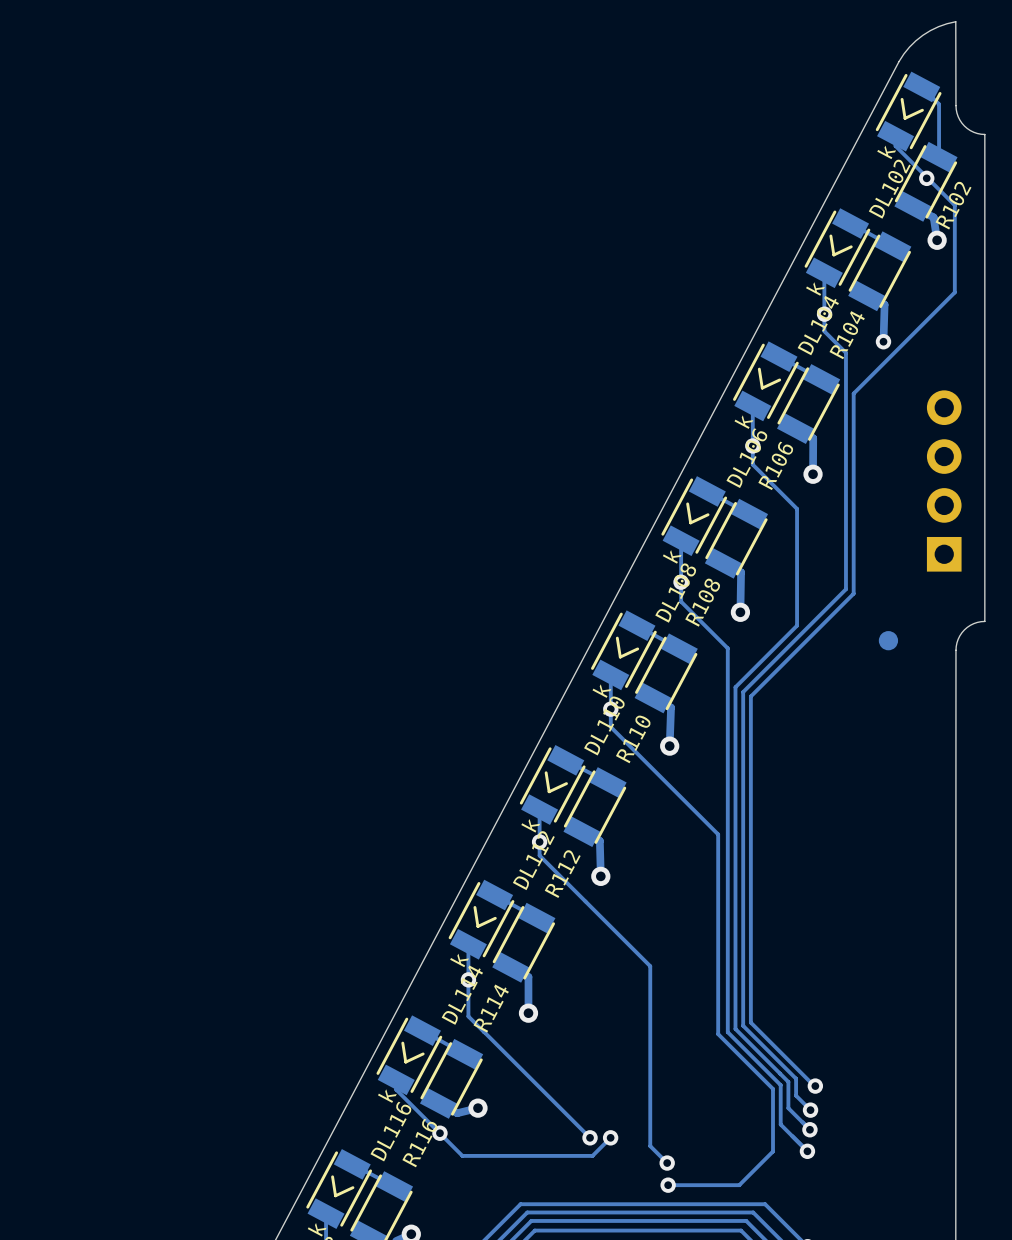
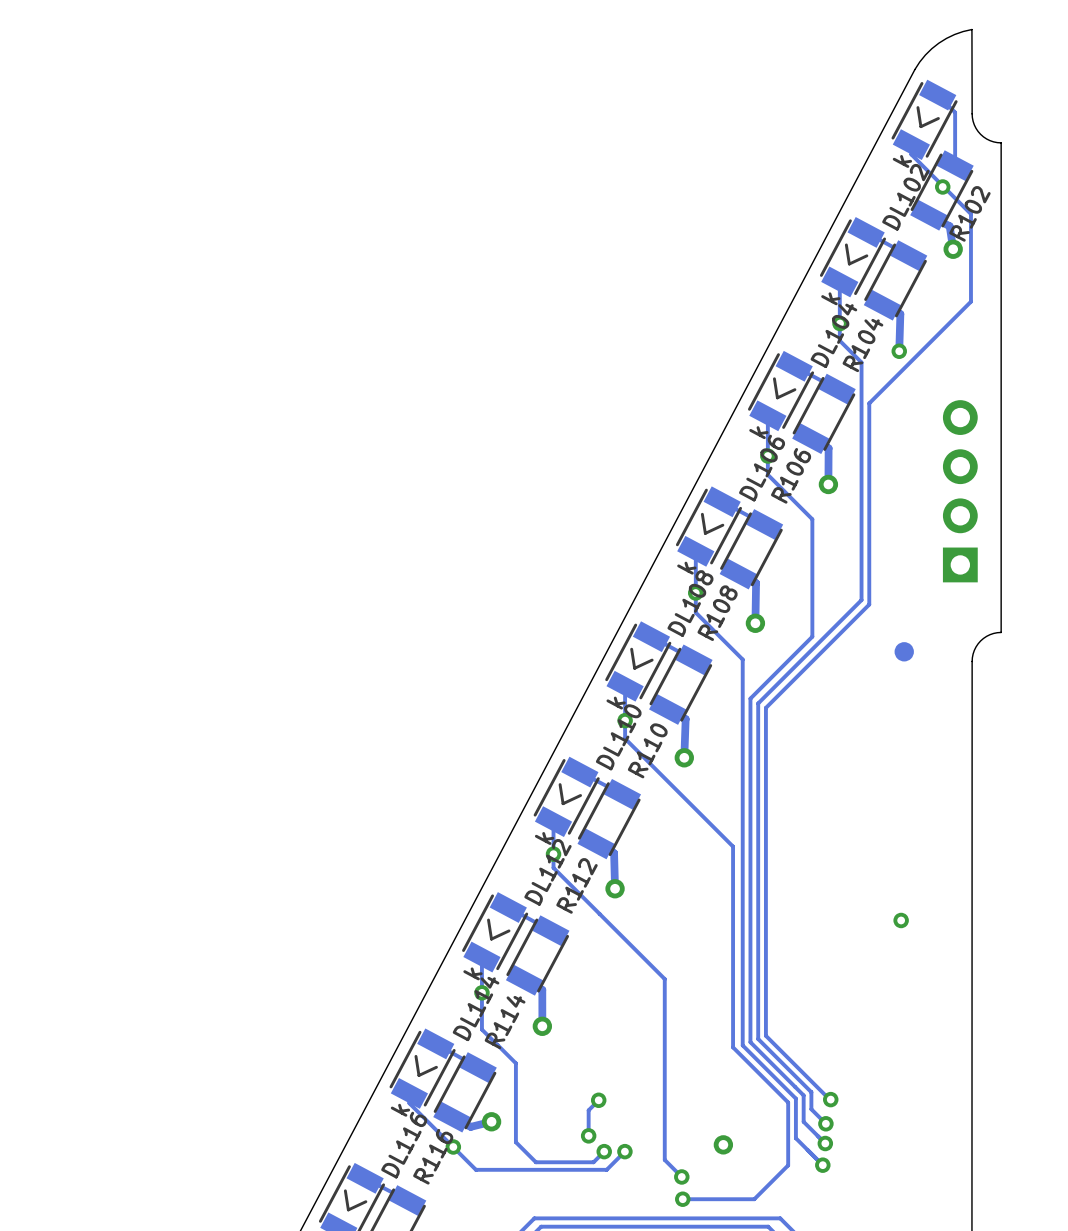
via: none -> (901, 920)
track: (502, 1050) (590, 1137) -> (515, 1063) (515, 1142) (535, 1162) (593, 1162) (604, 1151)
track: none -> (598, 1100) (588, 1110) (588, 1135)
via: none -> (598, 1100)
via: none -> (588, 1135)
via: none -> (723, 1144)

